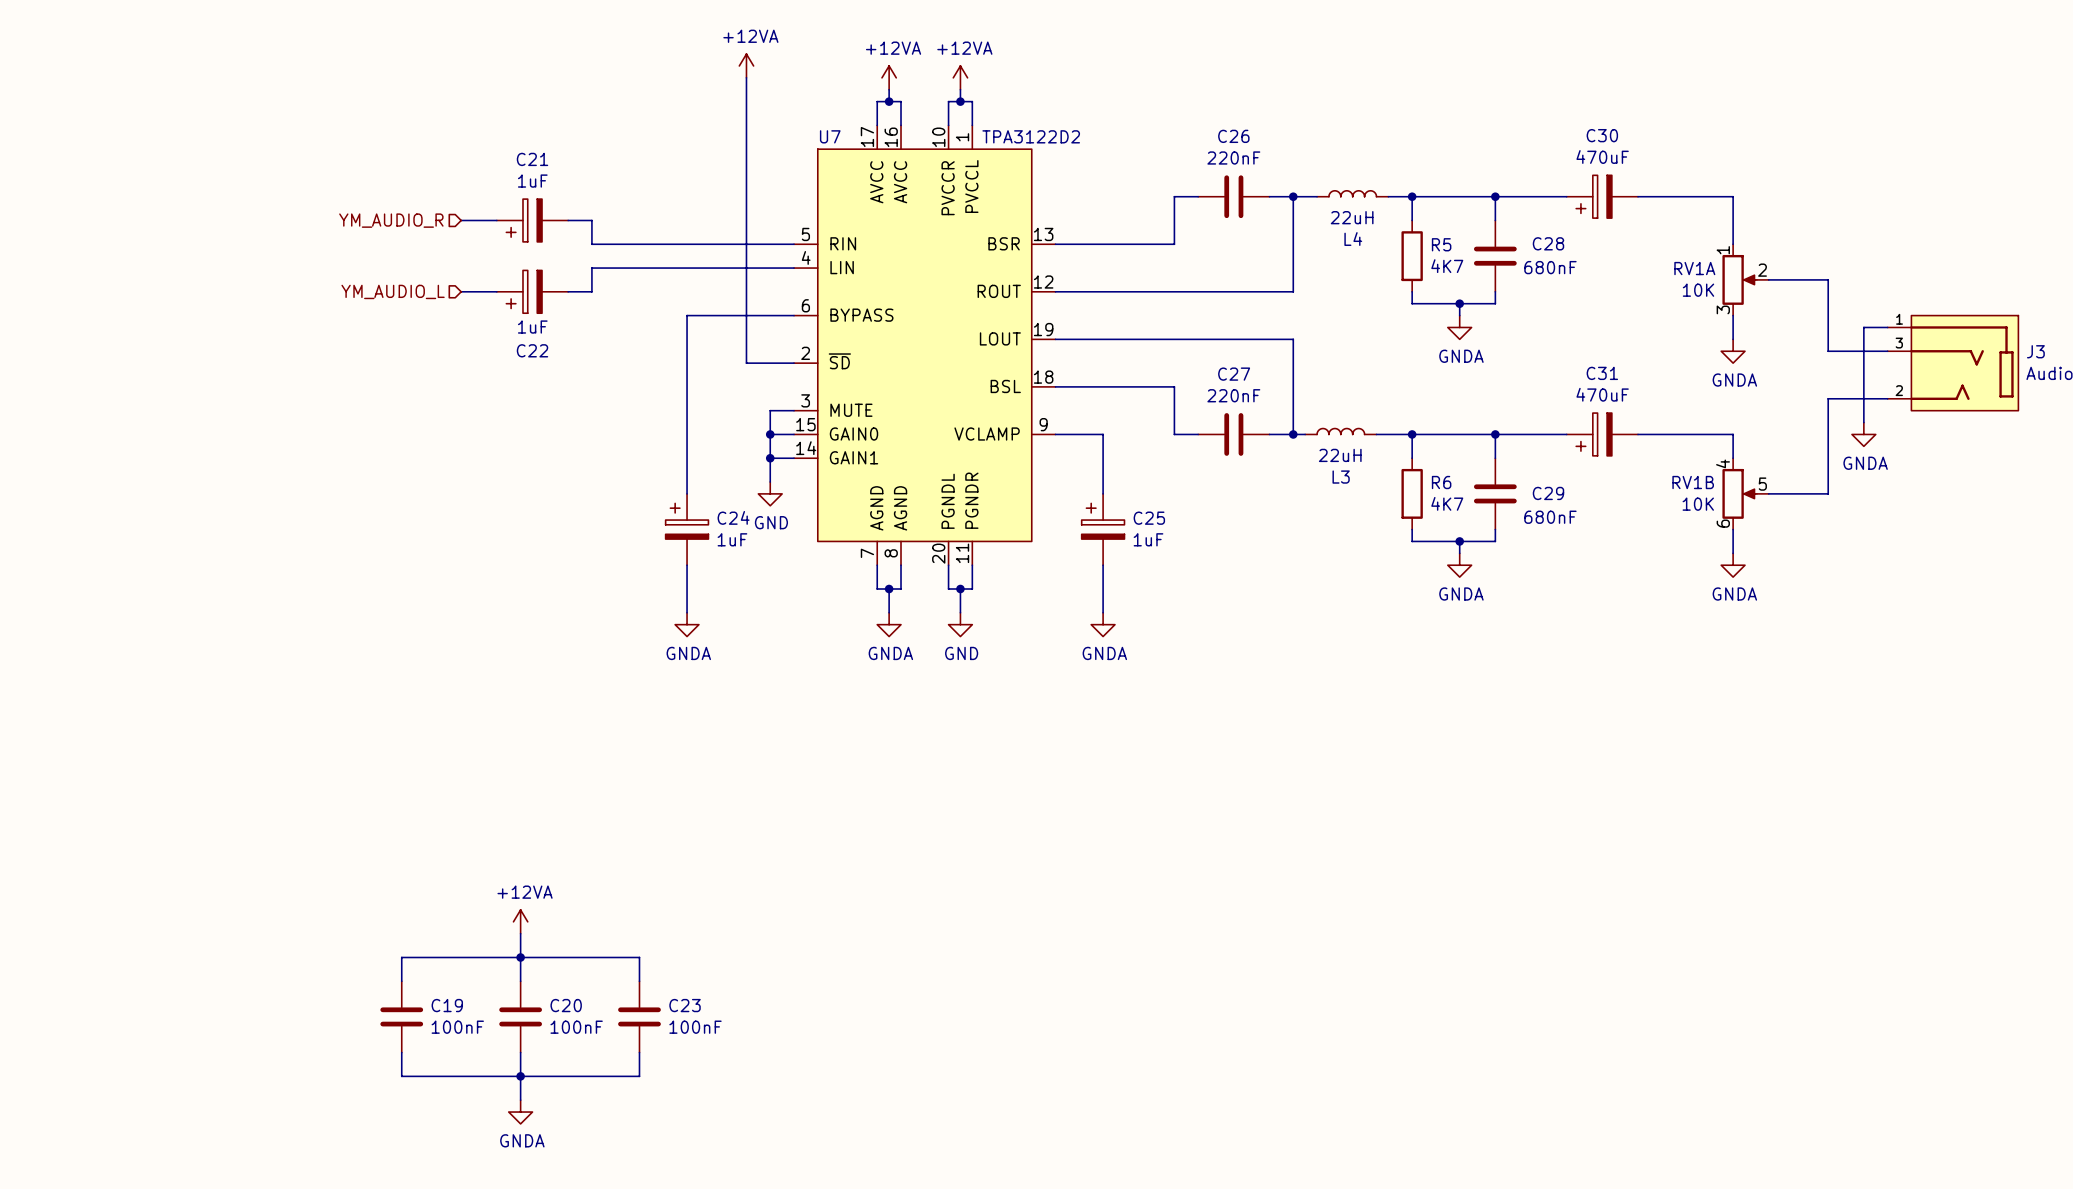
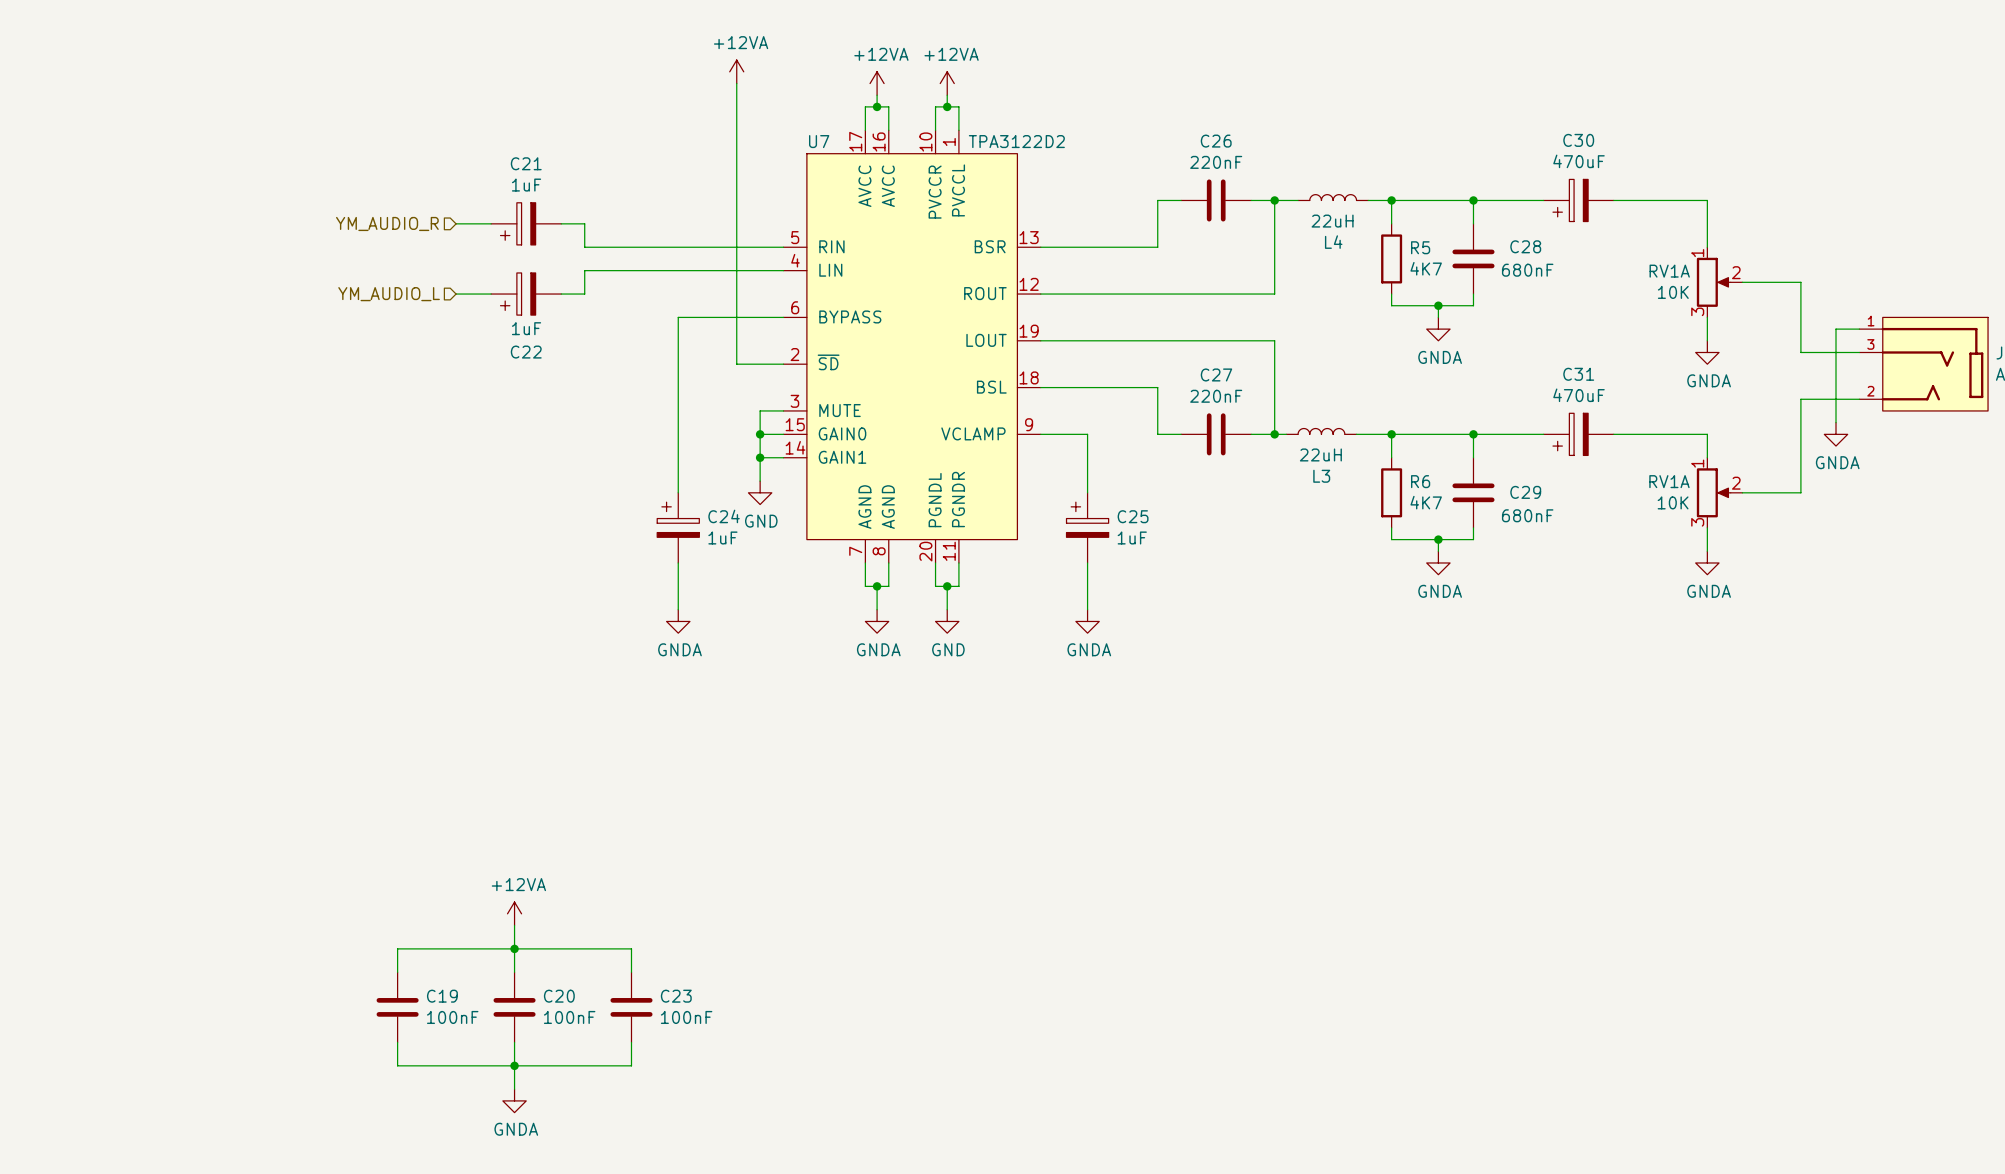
RV1B pin number: 4 (1723, 463) -> 1 (1697, 463)
RV1B name: RV1B (1693, 482) -> RV1A (1669, 481)
RV1B pin number: 5 (1762, 484) -> 2 (1736, 483)
RV1B pin number: 6 (1723, 523) -> 3 (1697, 522)

